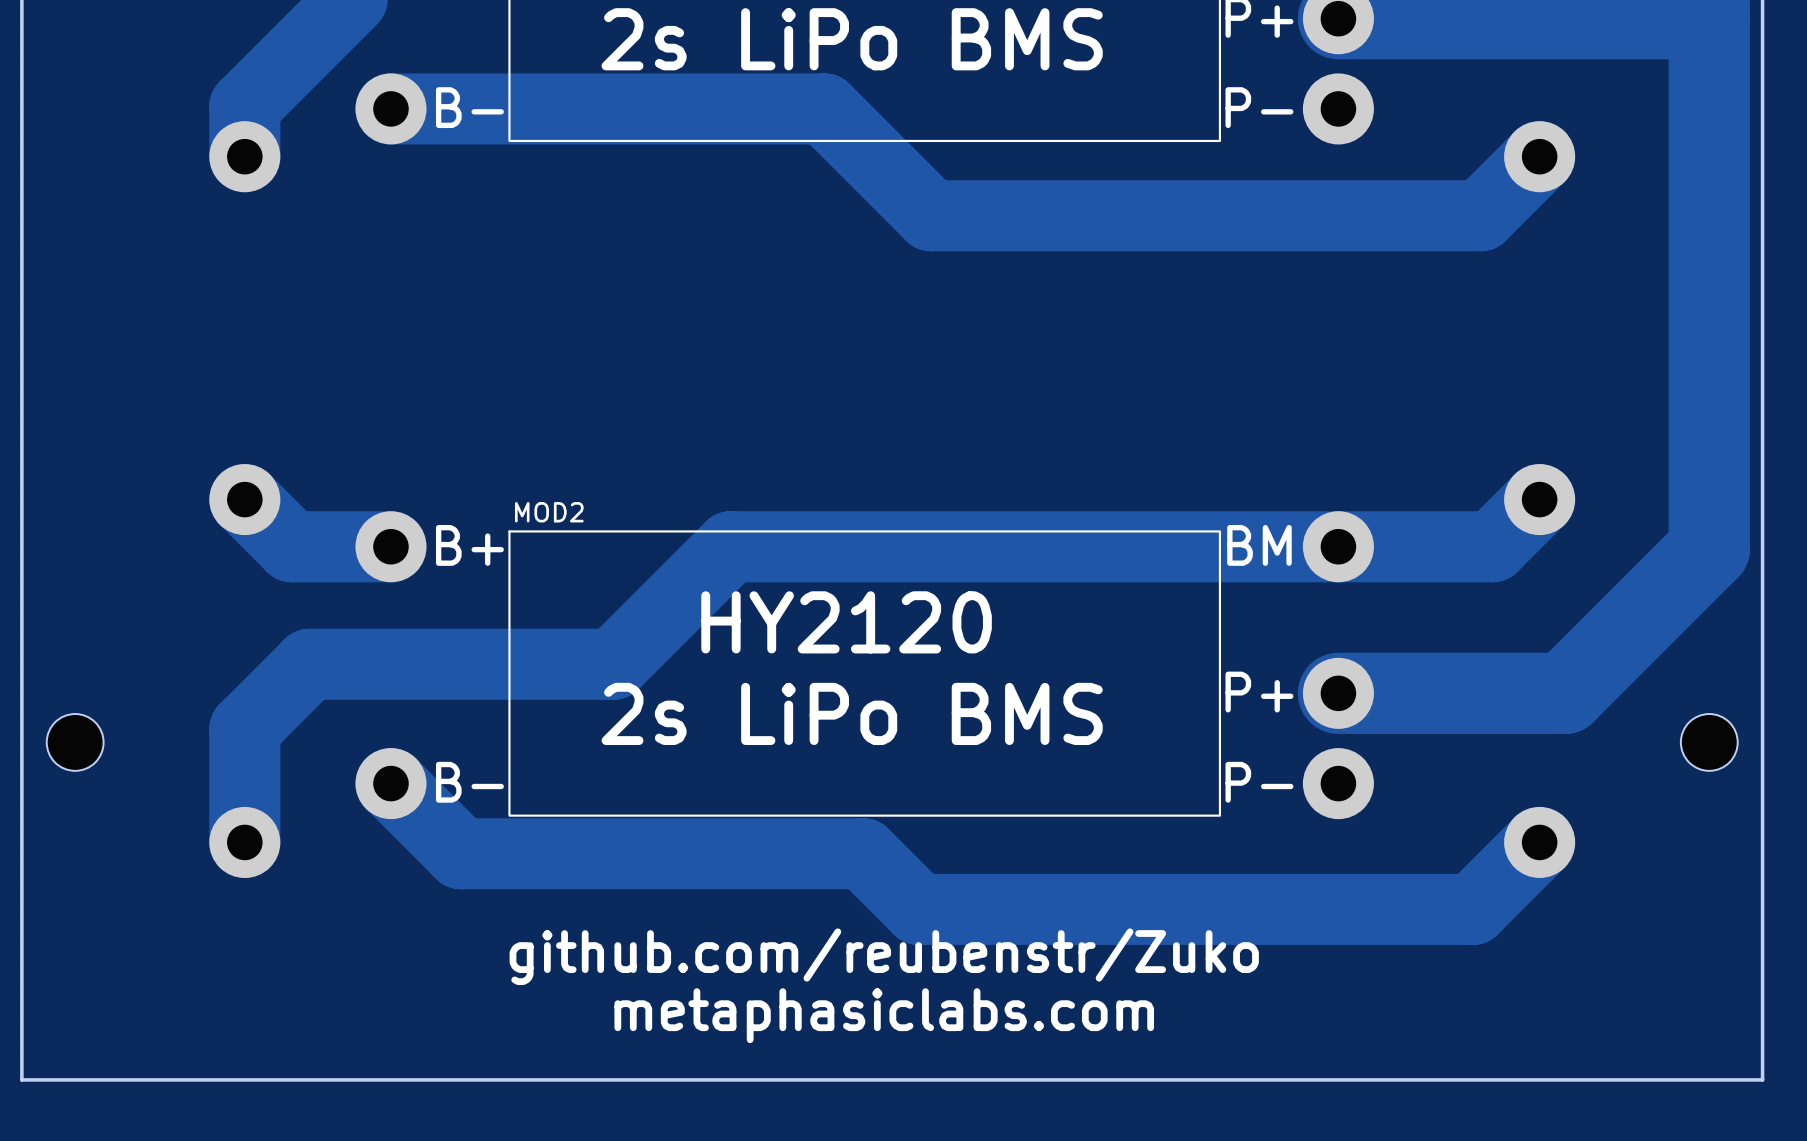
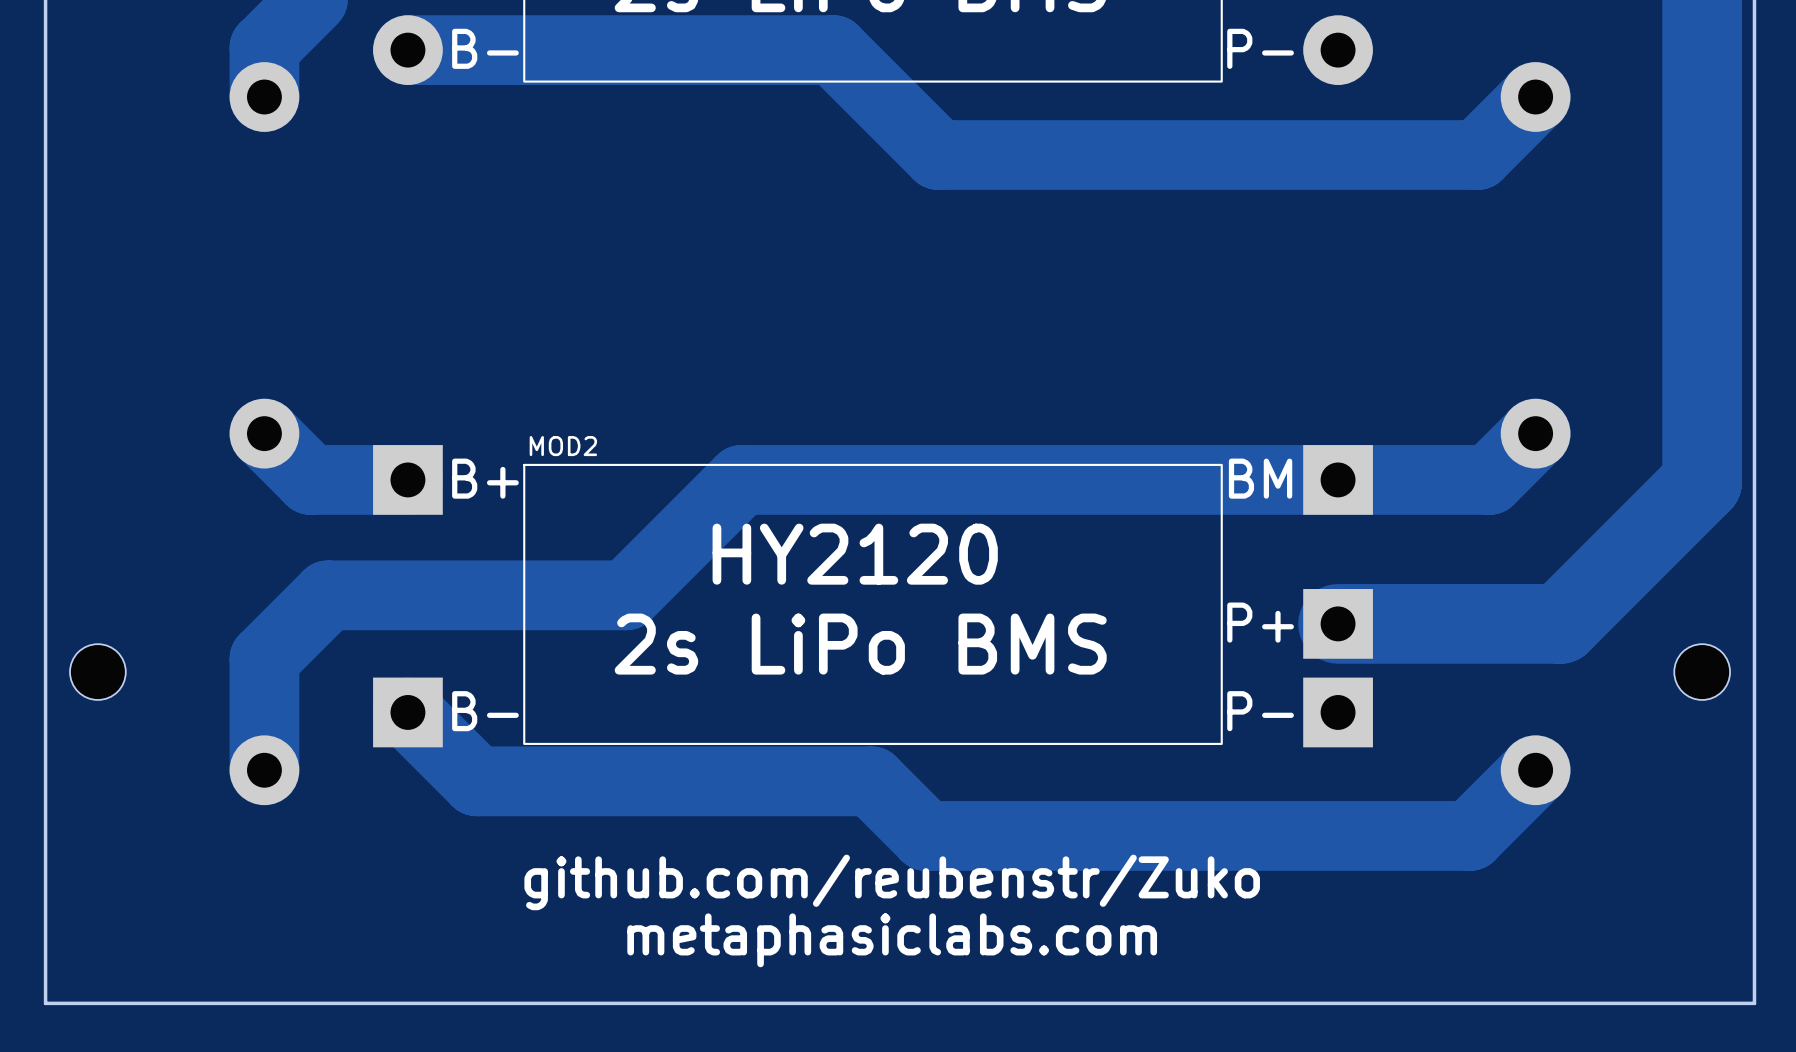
MOD2 footprint: [355, 511, 1374, 820] -> [373, 445, 1373, 748]

